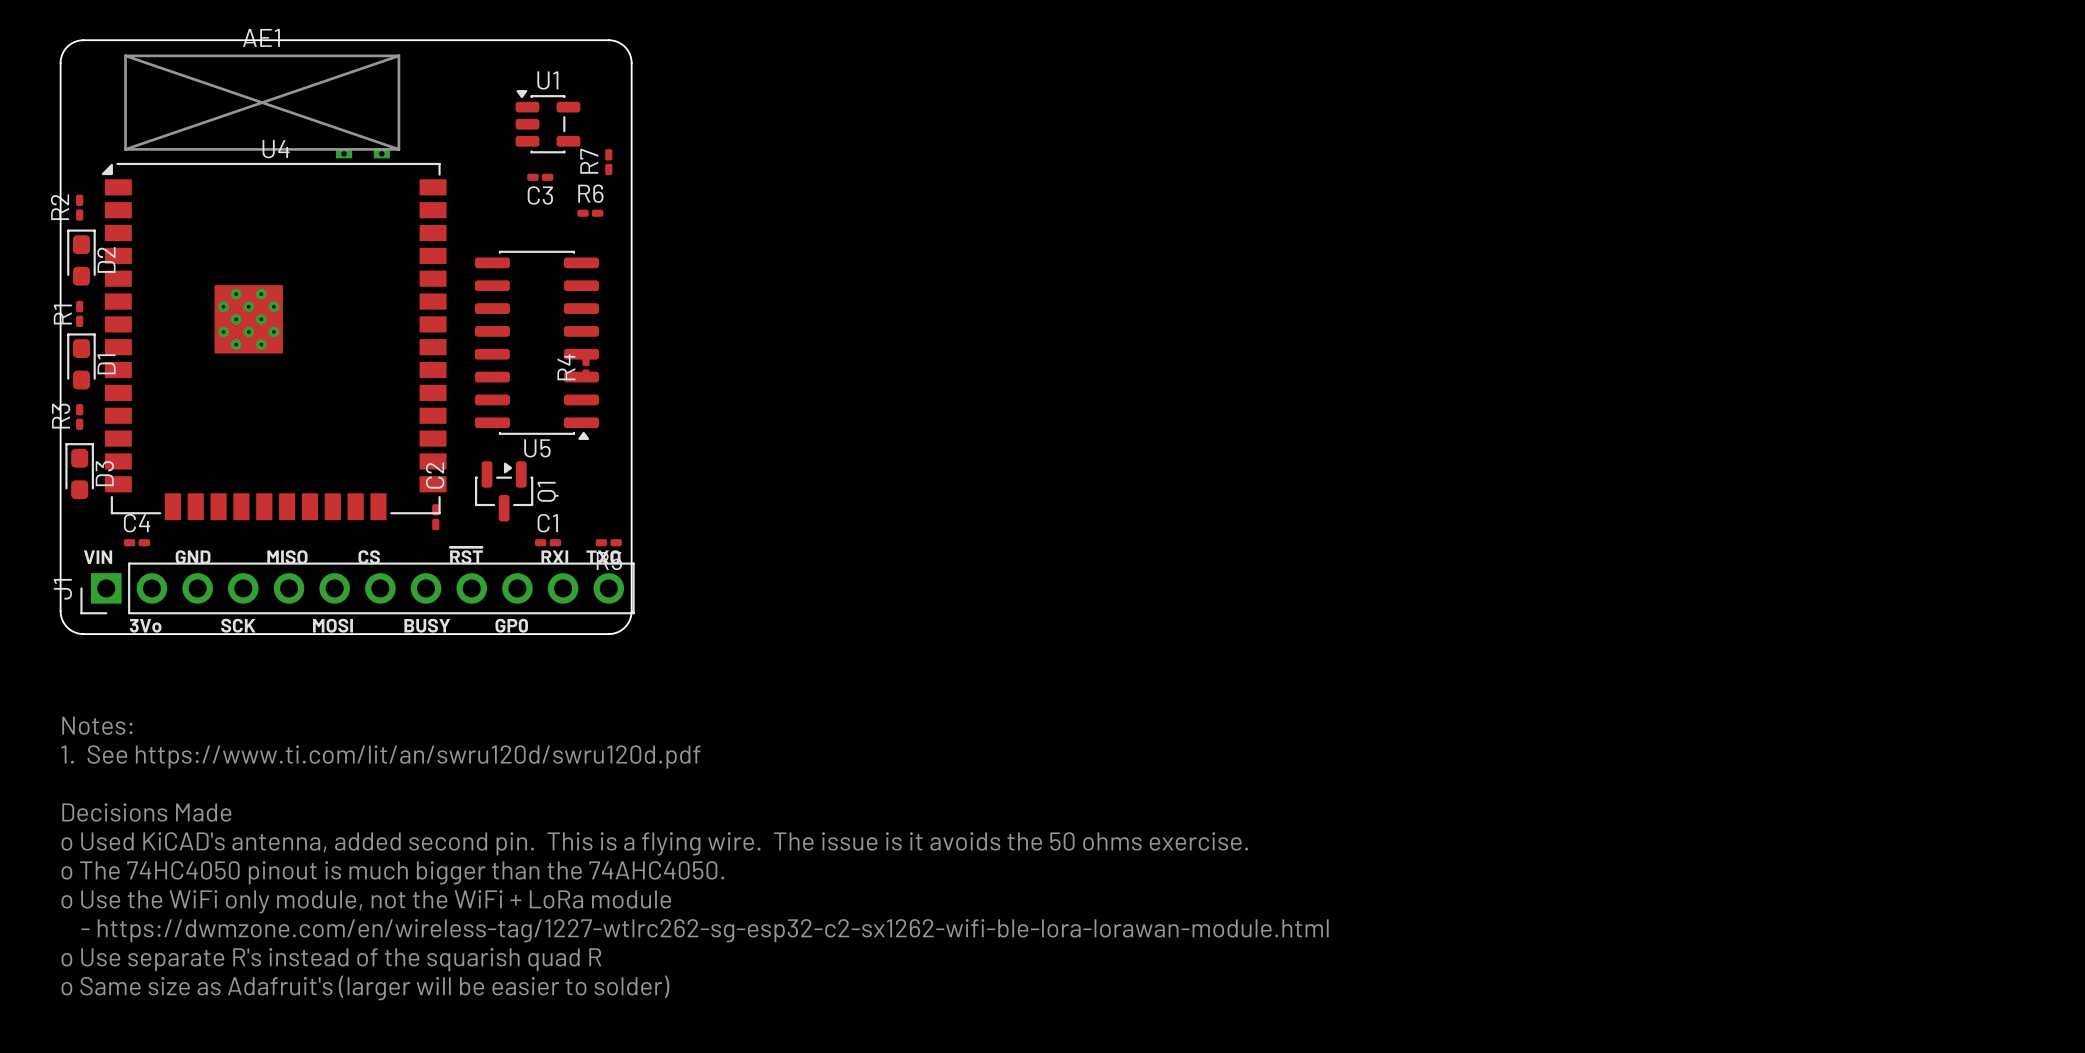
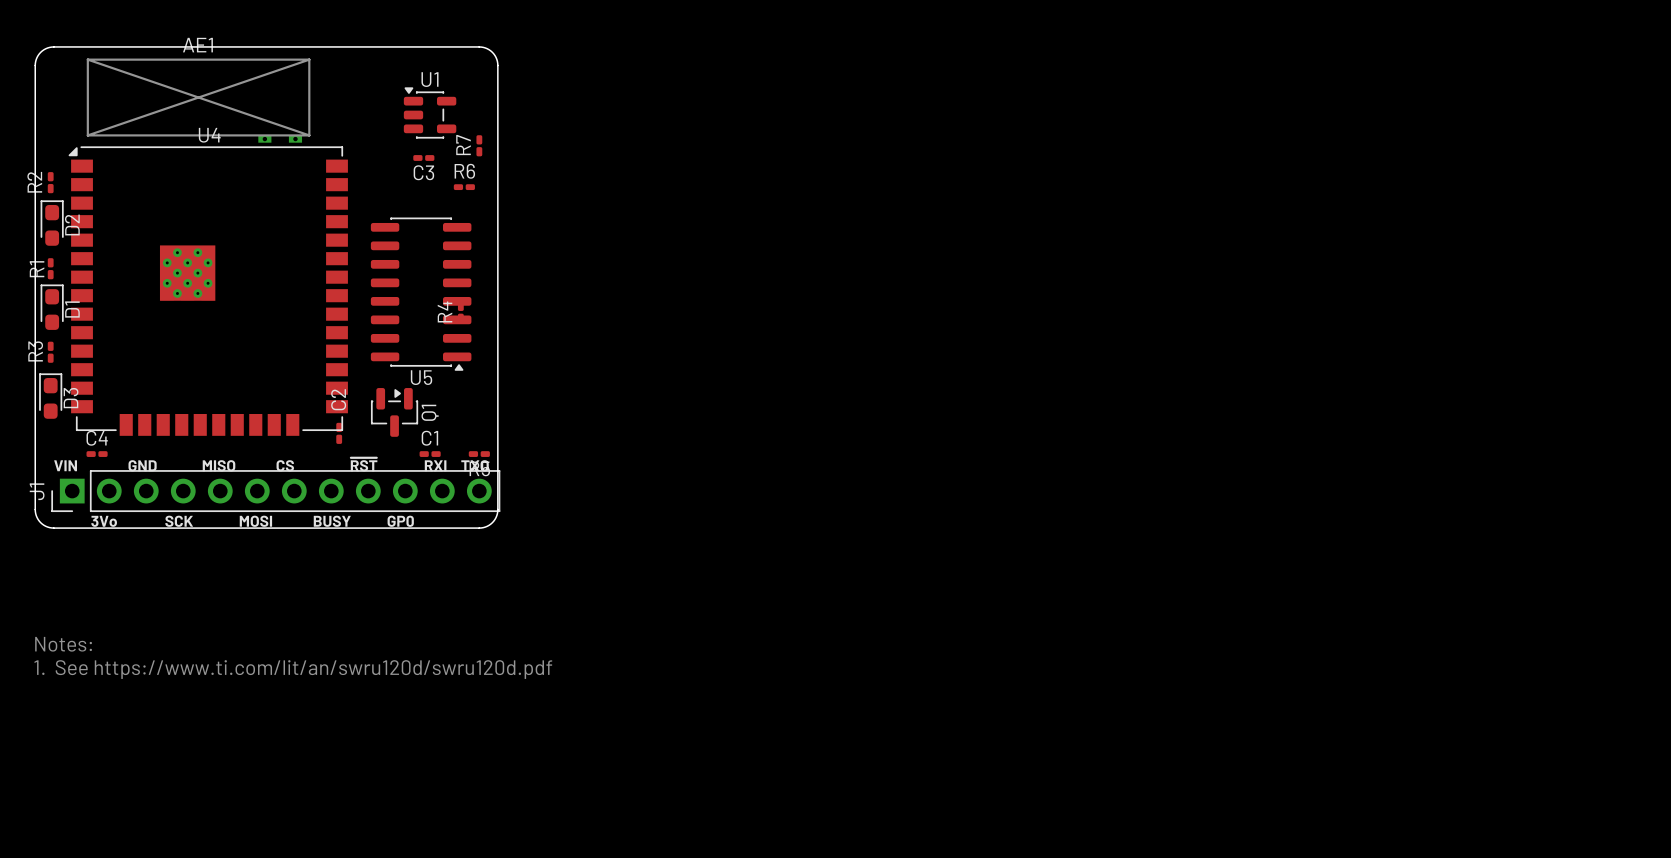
text position: Notes: (97, 725) -> Notes: (63, 644)
text position: 1. See https://www.ti.com/lit/an/swru120d/swru120d.pdf (380, 756) -> 1. See https://www.ti.com/lit/an/swru120d/swru120d.pdf (293, 669)
text: Decisions Made (146, 812) -> none
text: o Used KiCAD's antenna, added second pin. This is a flying wire. The issue is it avoids the 50 ohms exercise. (654, 843) -> none
text: o The 74HC4050 pinout is much bigger than the 74AHC4050. (392, 872) -> none
text: o Use the WiFi only module, not the WiFi + LoRa module (366, 901) -> none
text: - https://dwmzone.com/en/wireless-tag/1227-wtlrc262-sg-esp32-c2-sx1262-wifi-ble-lora-lorawan-module.html (705, 930) -> none
text: o Use separate R's instead of the squarish quad R (331, 959) -> none
text: o Same size as Adafruit's (larger will be easier to solder) (365, 987) -> none

